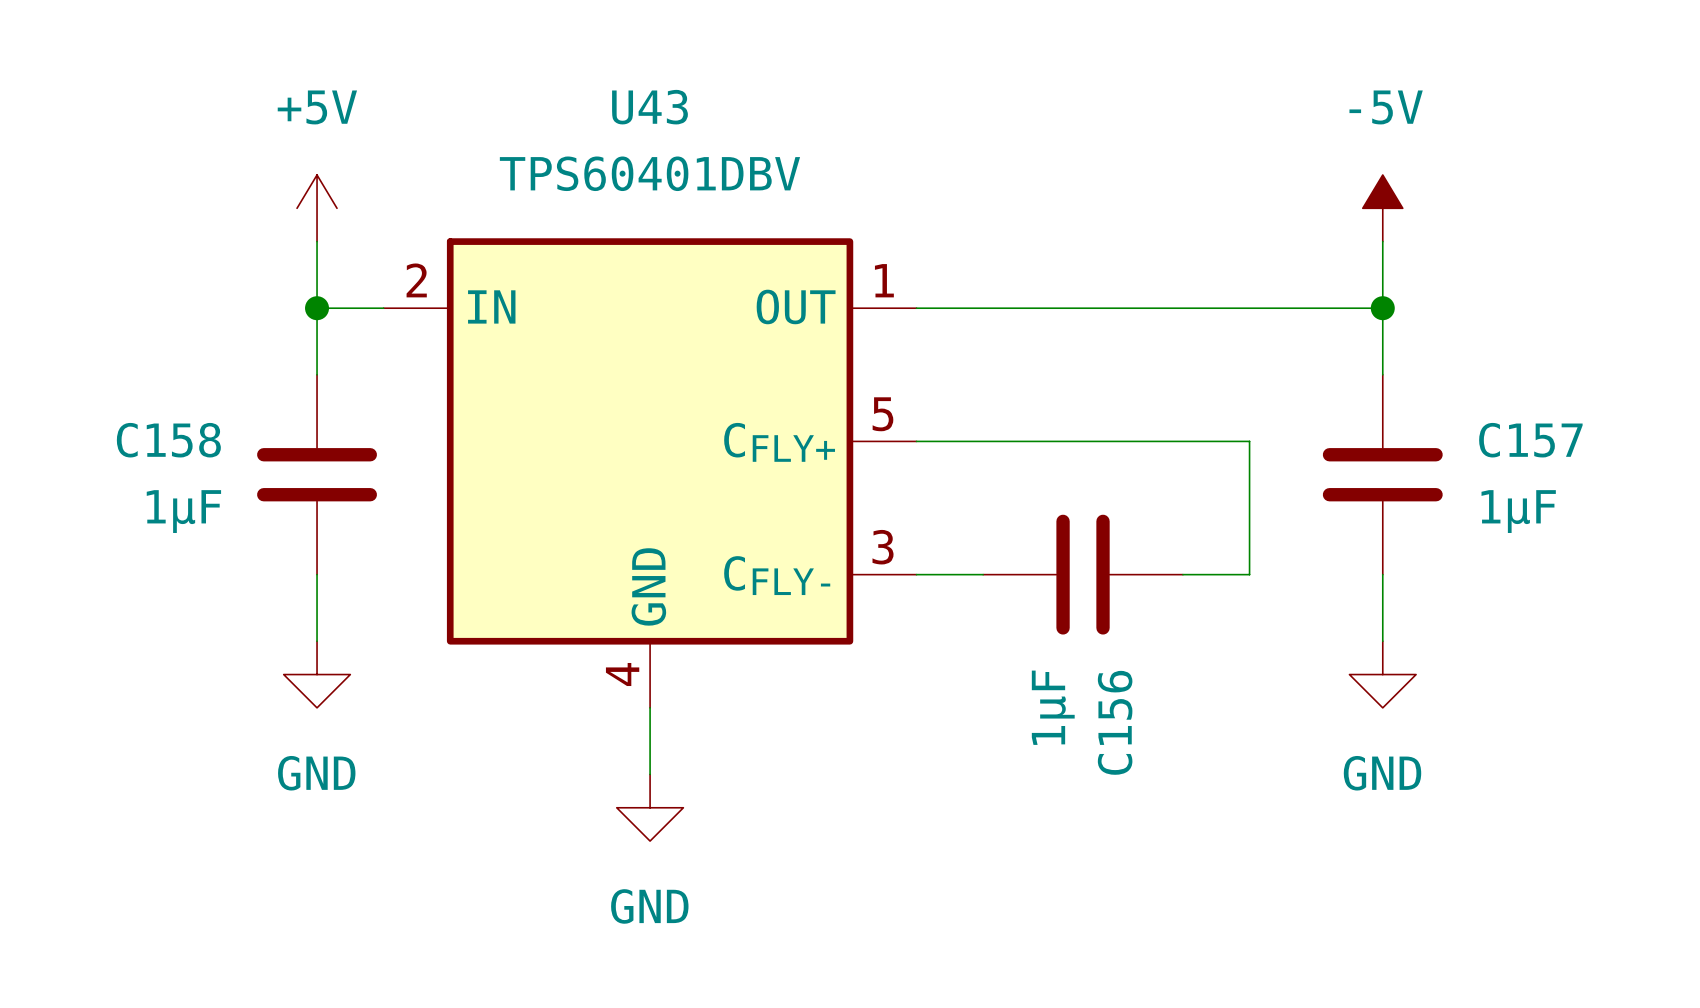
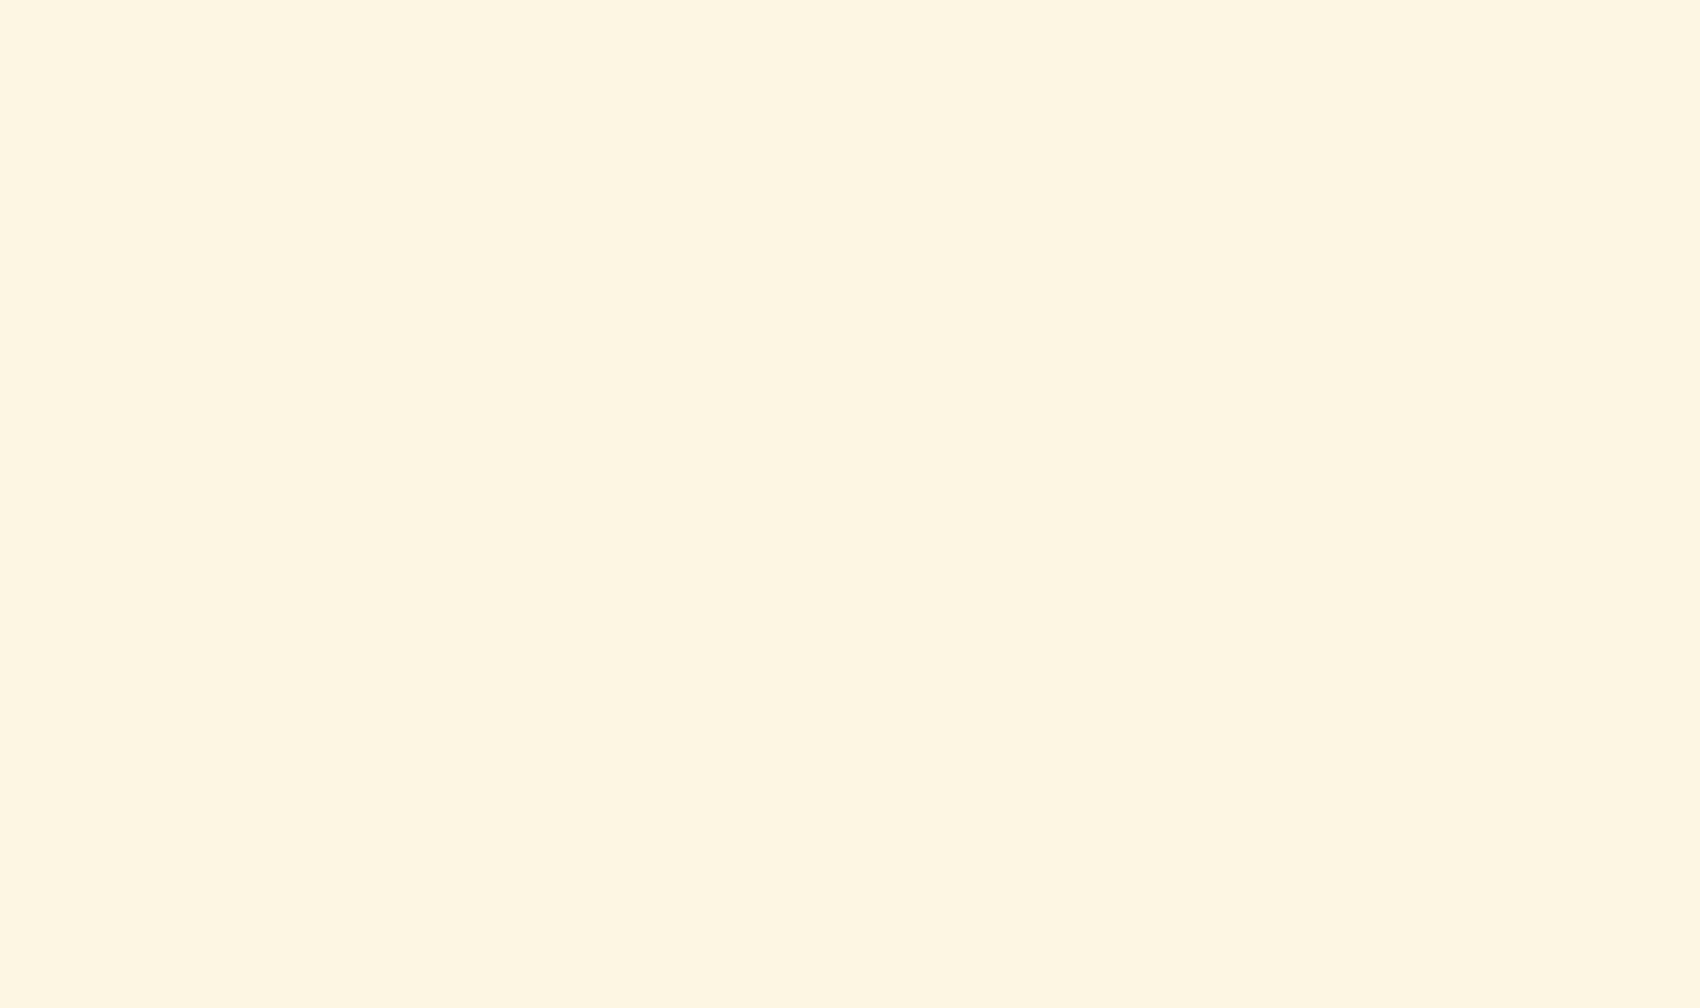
power symbol: +5V (317, 208) -> none
power symbol: -5V (1382, 208) -> none
wire: (317, 241) (317, 374) -> none
wire: (1382, 241) (1382, 374) -> none
wire: (317, 308) (383, 308) -> none
junction: (317, 308) -> none
wire: (916, 308) (1382, 308) -> none
junction: (1382, 308) -> none
wire: (916, 441) (1249, 441) (1249, 574) (1182, 574) -> none
U43: TPS60401DBV (650, 473) -> none
C158: 1μF (317, 474) -> none
C157: 1μF (1382, 474) -> none
wire: (317, 574) (317, 641) -> none
wire: (916, 574) (983, 574) -> none
C156: 1μF (1083, 574) -> none
wire: (1382, 574) (1382, 641) -> none
power symbol: GND (317, 674) -> none
power symbol: GND (1382, 674) -> none
wire: (650, 707) (650, 774) -> none
power symbol: GND (650, 807) -> none

